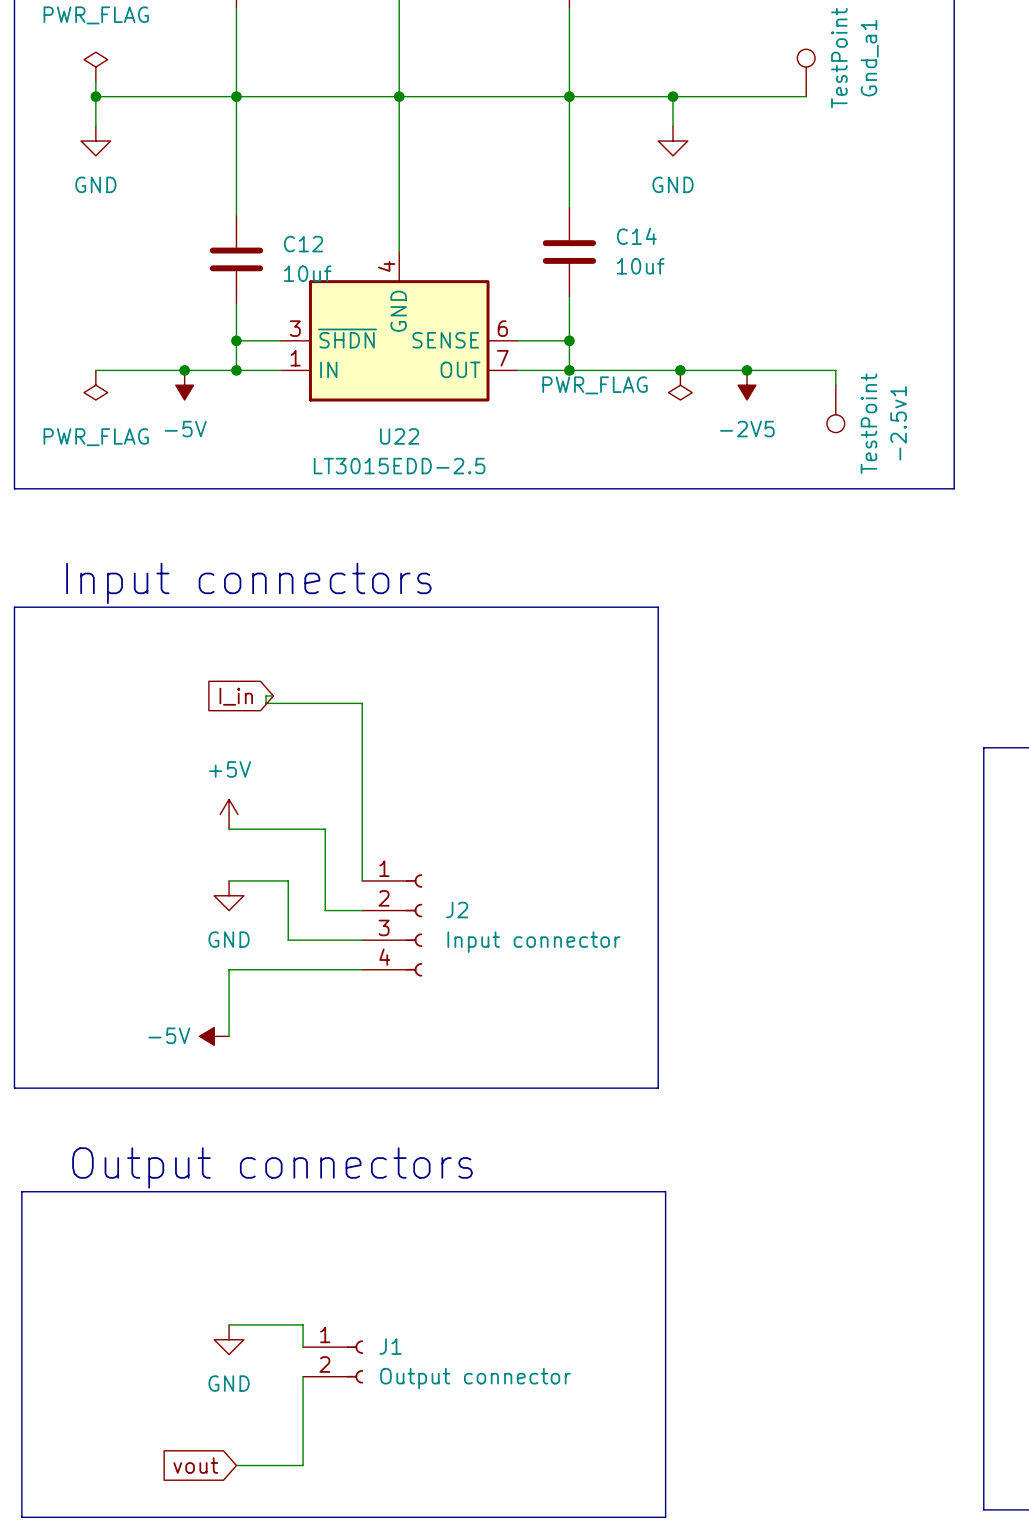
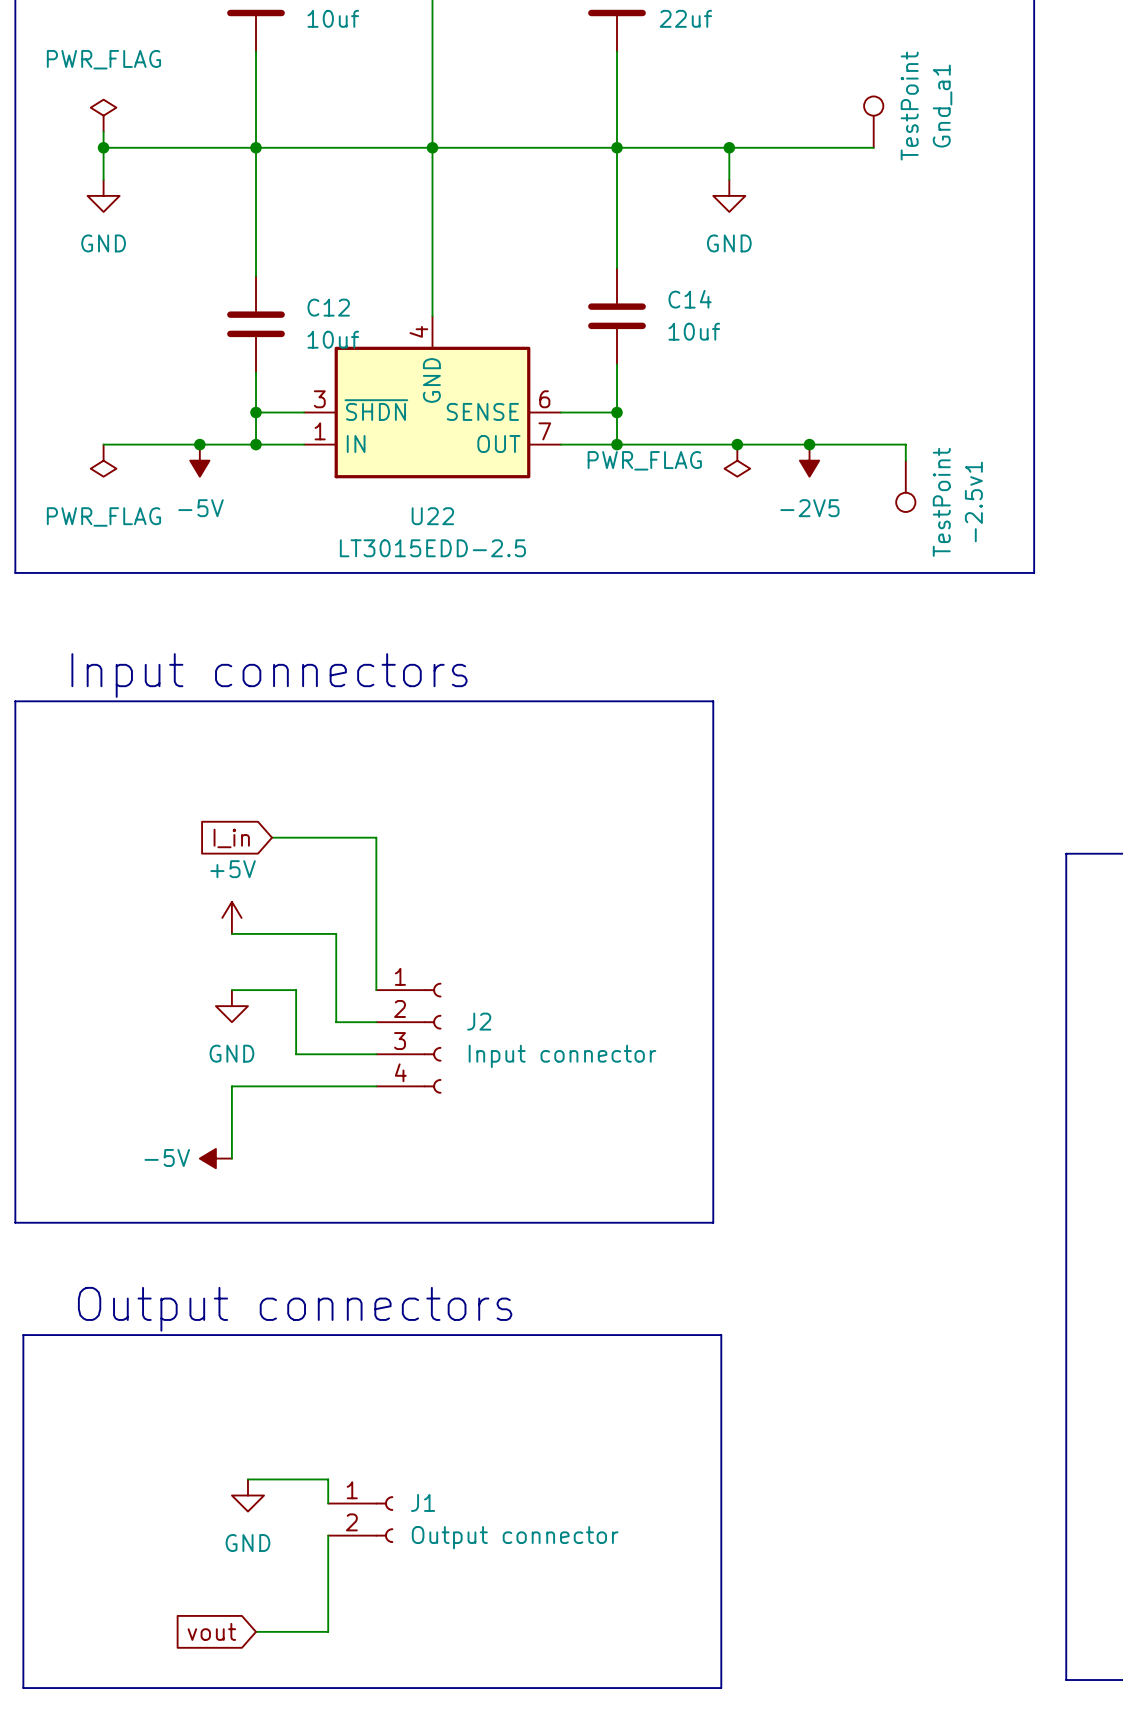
wire: (273, 695) (266, 695) (266, 703) (362, 703) (362, 880) -> none
global label position: I_in (236, 696) -> I_in (231, 838)
wire: none -> (272, 837) (376, 837) (376, 990)
power symbol position: +5V (229, 814) -> +5V (231, 917)
wire: (229, 829) (325, 829) (325, 910) (362, 910) -> (231, 933) (336, 933) (336, 1022) (376, 1022)
wire: (229, 880) (288, 880) (288, 940) (362, 940) -> (231, 990) (296, 990) (296, 1054) (376, 1054)
power symbol position: GND (229, 895) -> GND (231, 1006)
J2 position: (392, 925) -> (408, 1038)
wire: (362, 969) (229, 969) (229, 1036) -> (376, 1086) (231, 1086) (231, 1158)
power symbol position: -5V (214, 1036) -> -5V (215, 1158)

